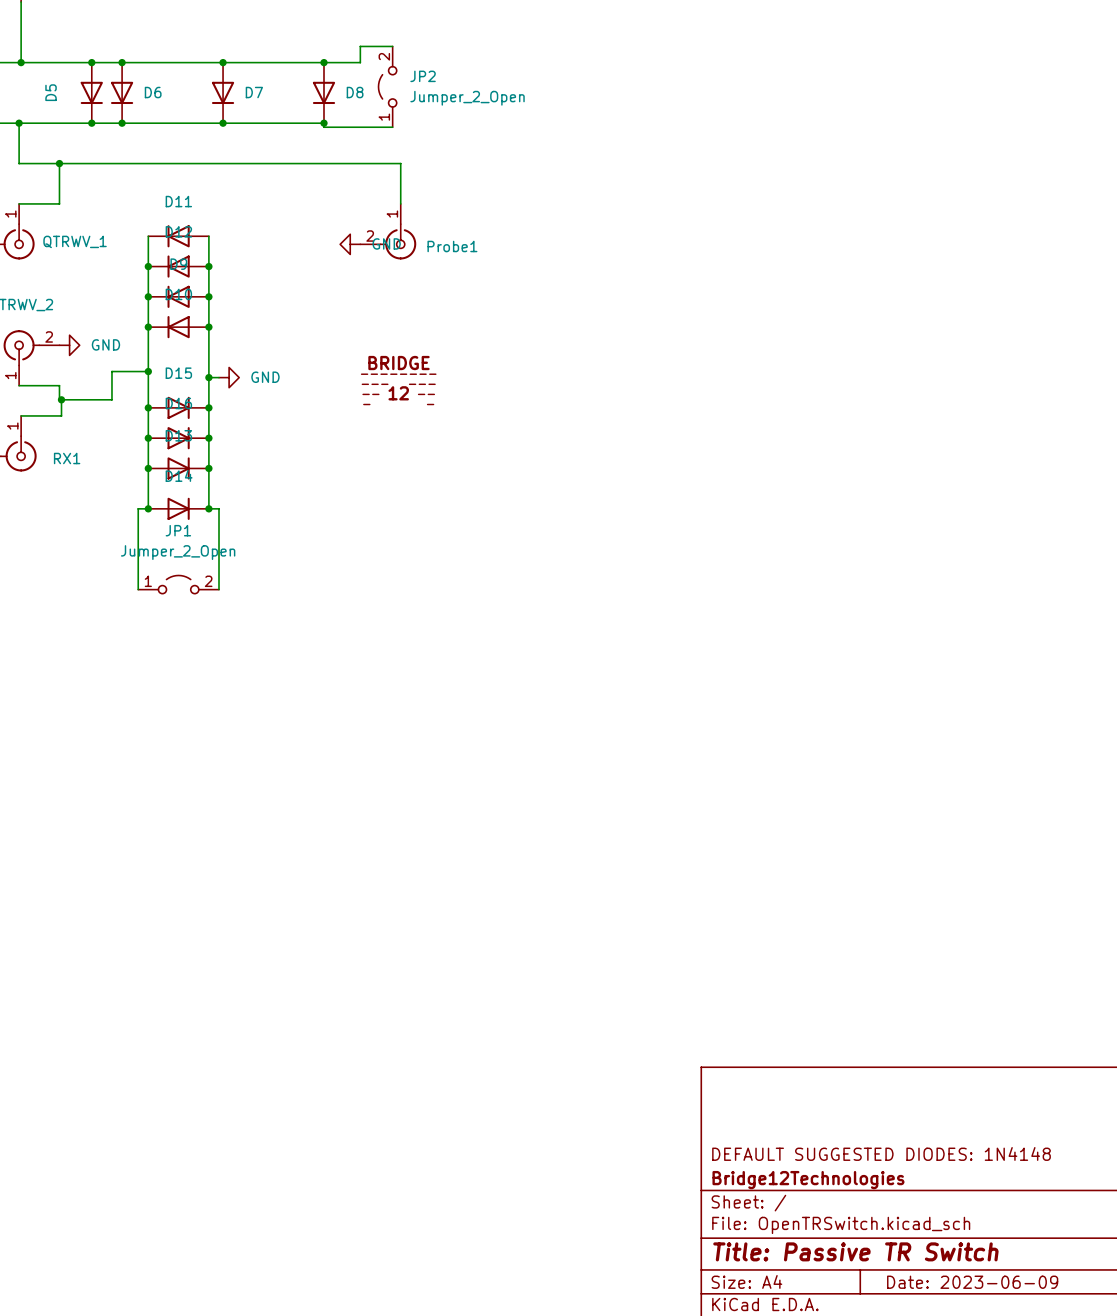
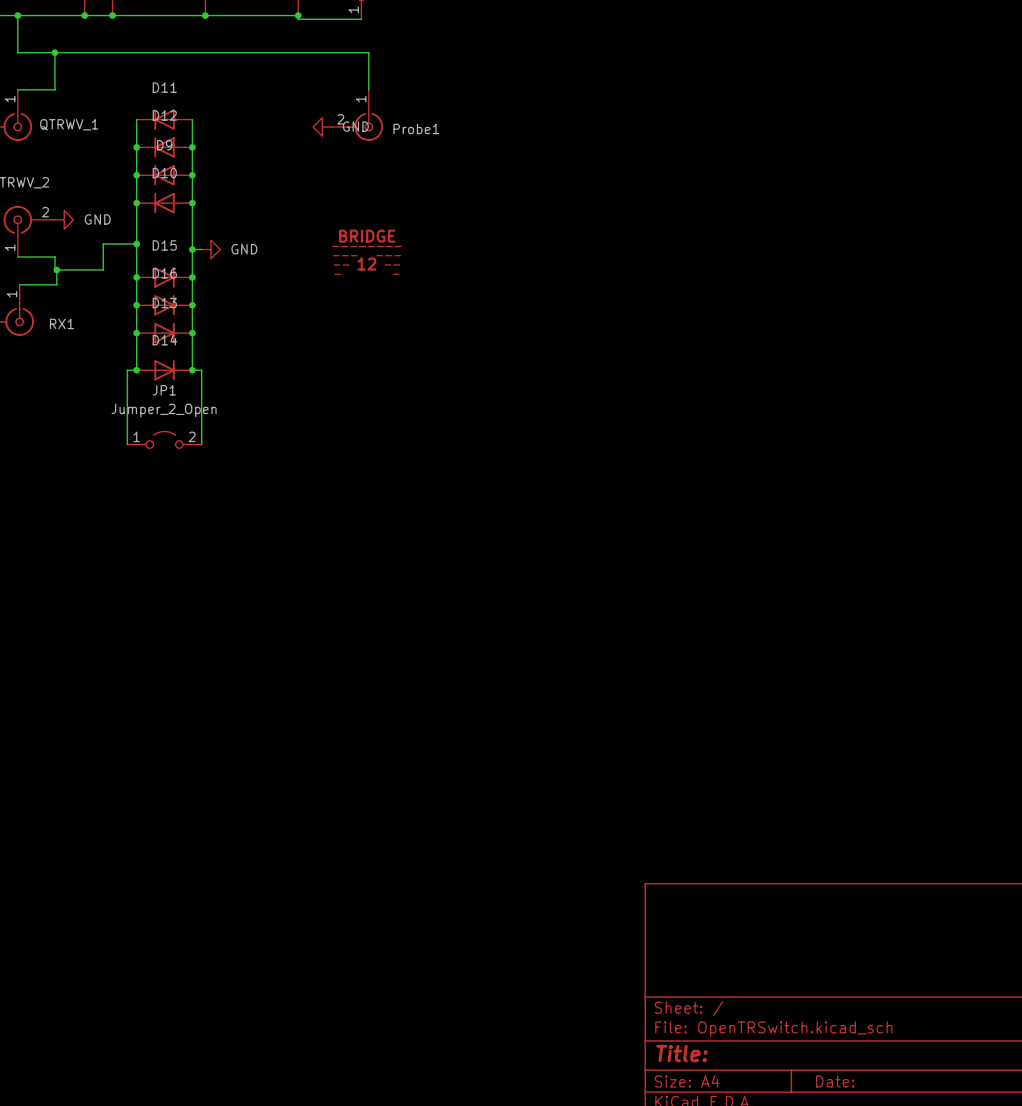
title block: DEFAULT SUGGESTED DIODES: 1N4148 (881, 1153) -> none
title block: Bridge12Technologies (808, 1180) -> none
title block: Title: Passive TR Switch (855, 1251) -> Title: (681, 1053)
title block: Date: 2023-06-09 (972, 1282) -> Date: (835, 1081)

